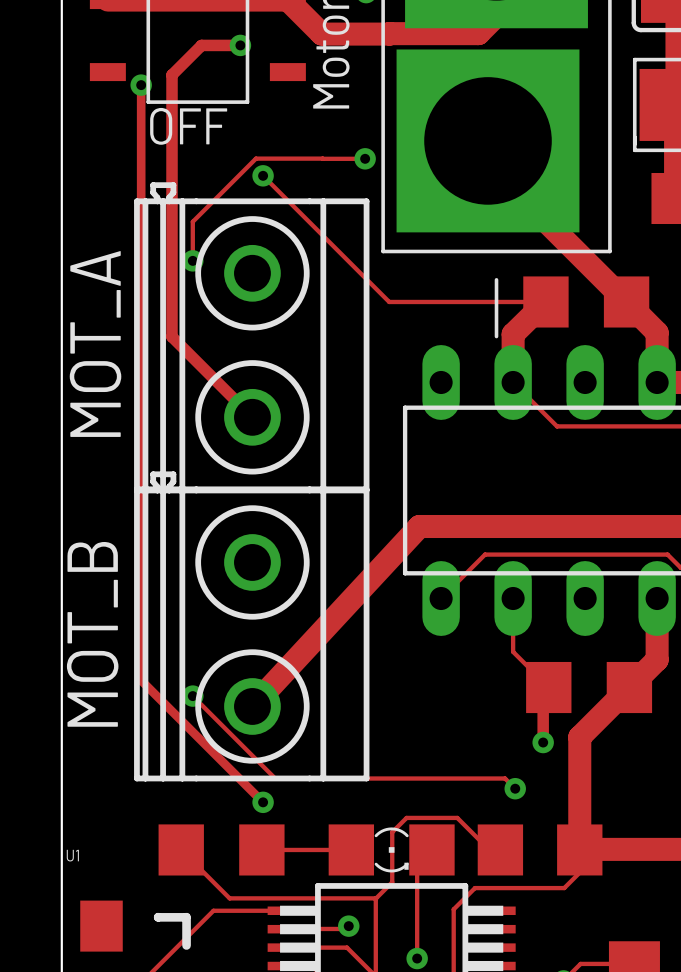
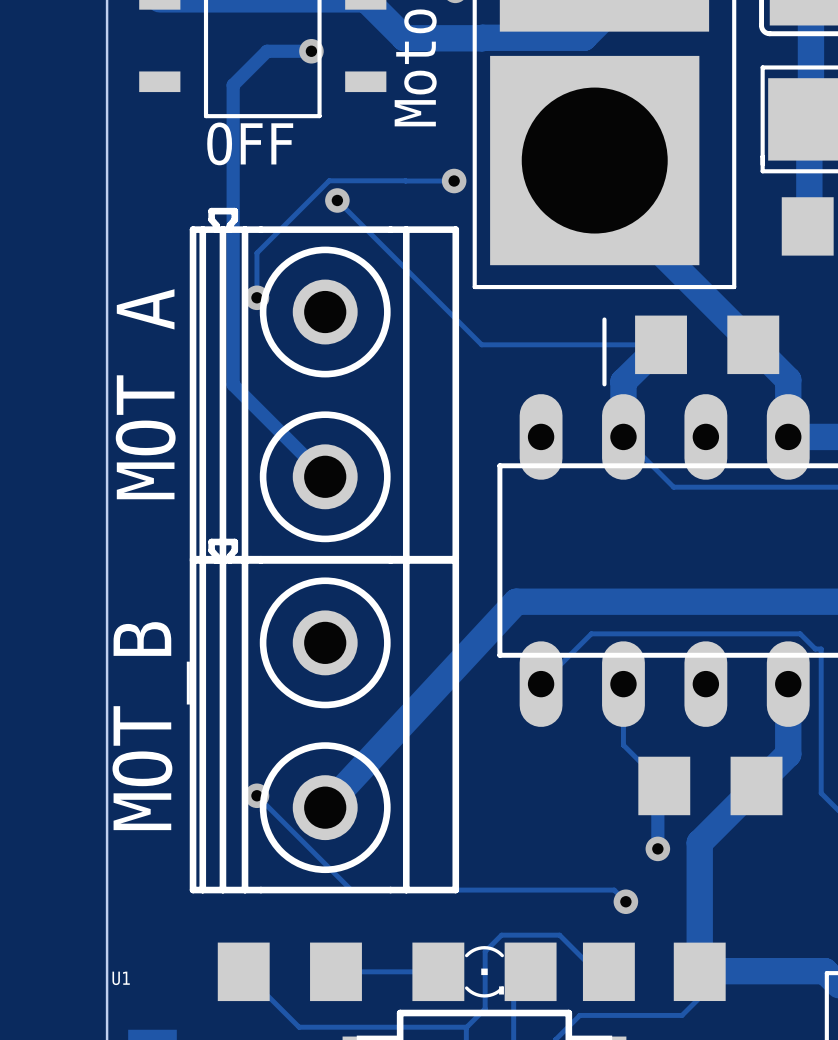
track: (141, 85) (141, 680) (263, 802) -> none
via: (141, 85) -> none
via: (263, 802) -> none

